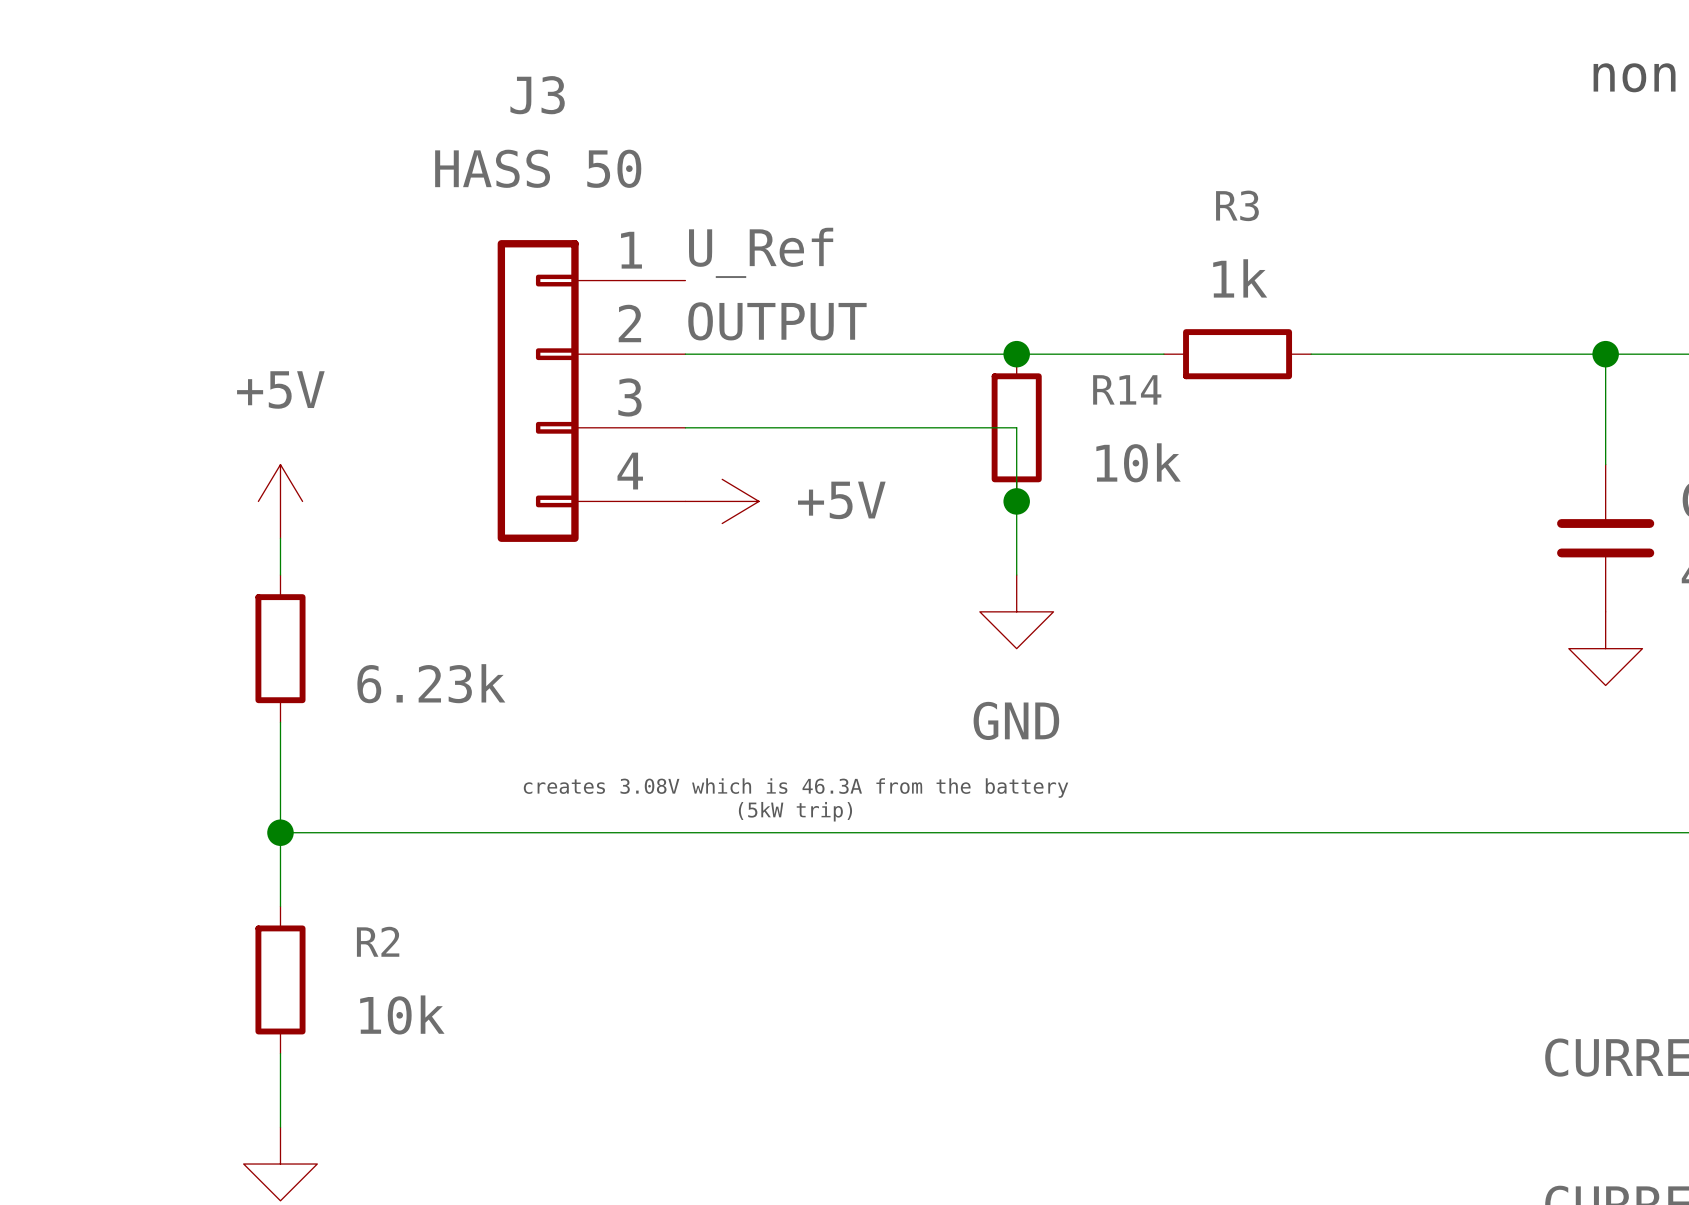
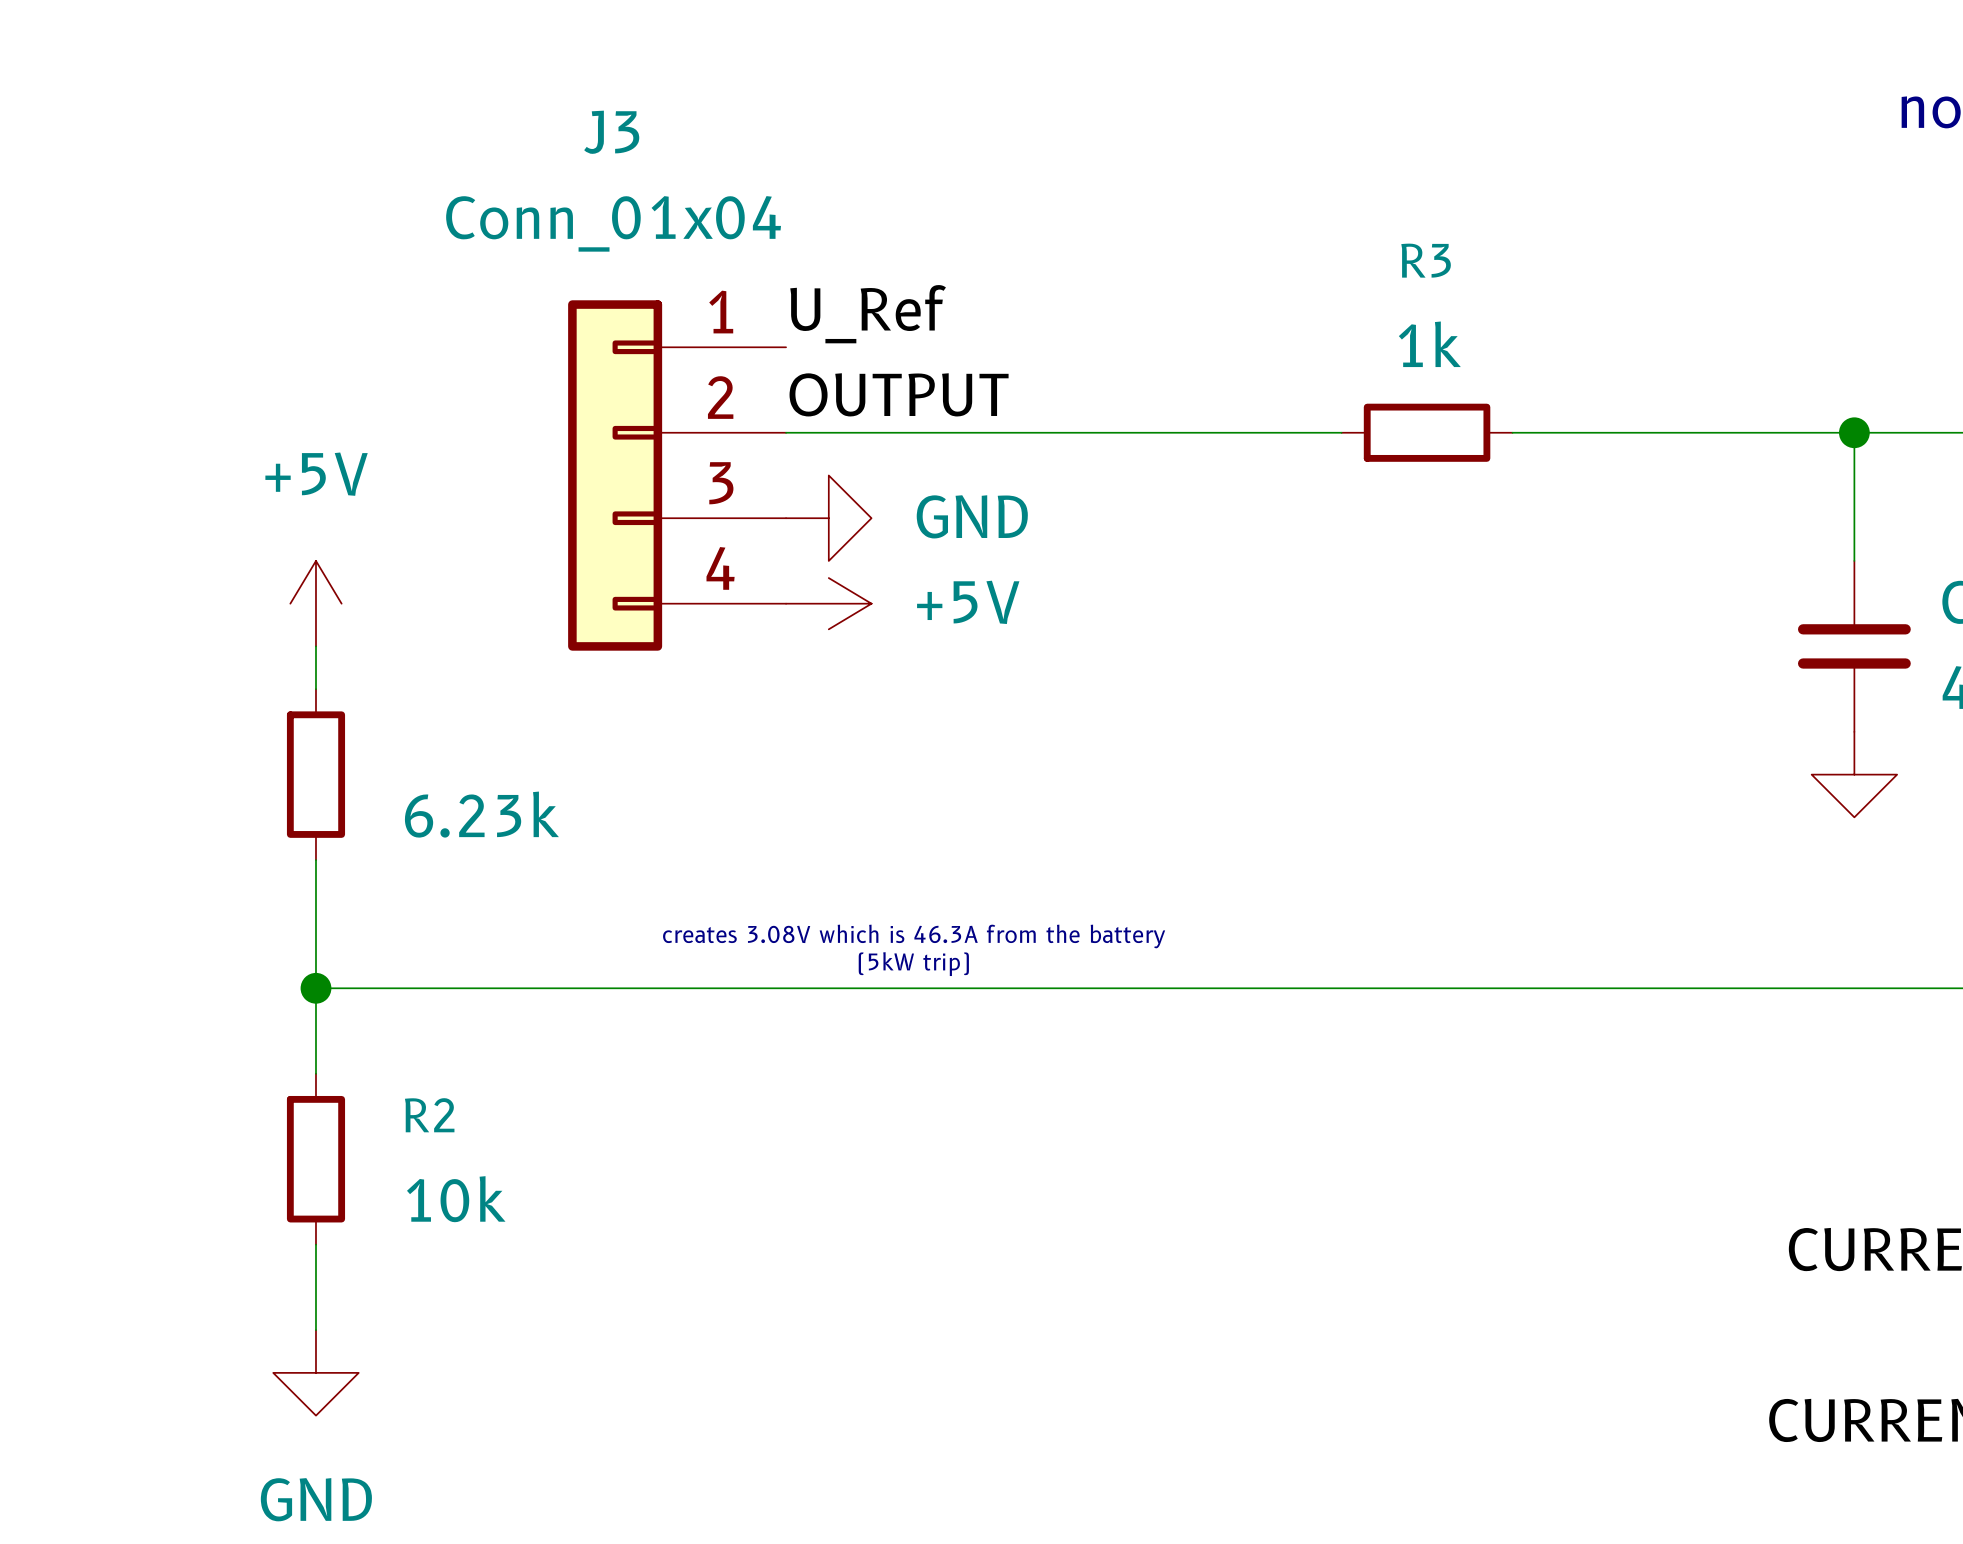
J3 value: HASS 50 (538, 168) -> Conn_01x04 (613, 223)
junction: (1016, 354) -> none
wire: (685, 427) (1016, 427) (1016, 575) -> none
R14: 10k (1016, 427) -> none
junction: (1016, 501) -> none
power symbol rotation: 0° (1016, 611) -> 90° counterclockwise (828, 518)
power symbol position: GND (1016, 611) -> GND (828, 518)

